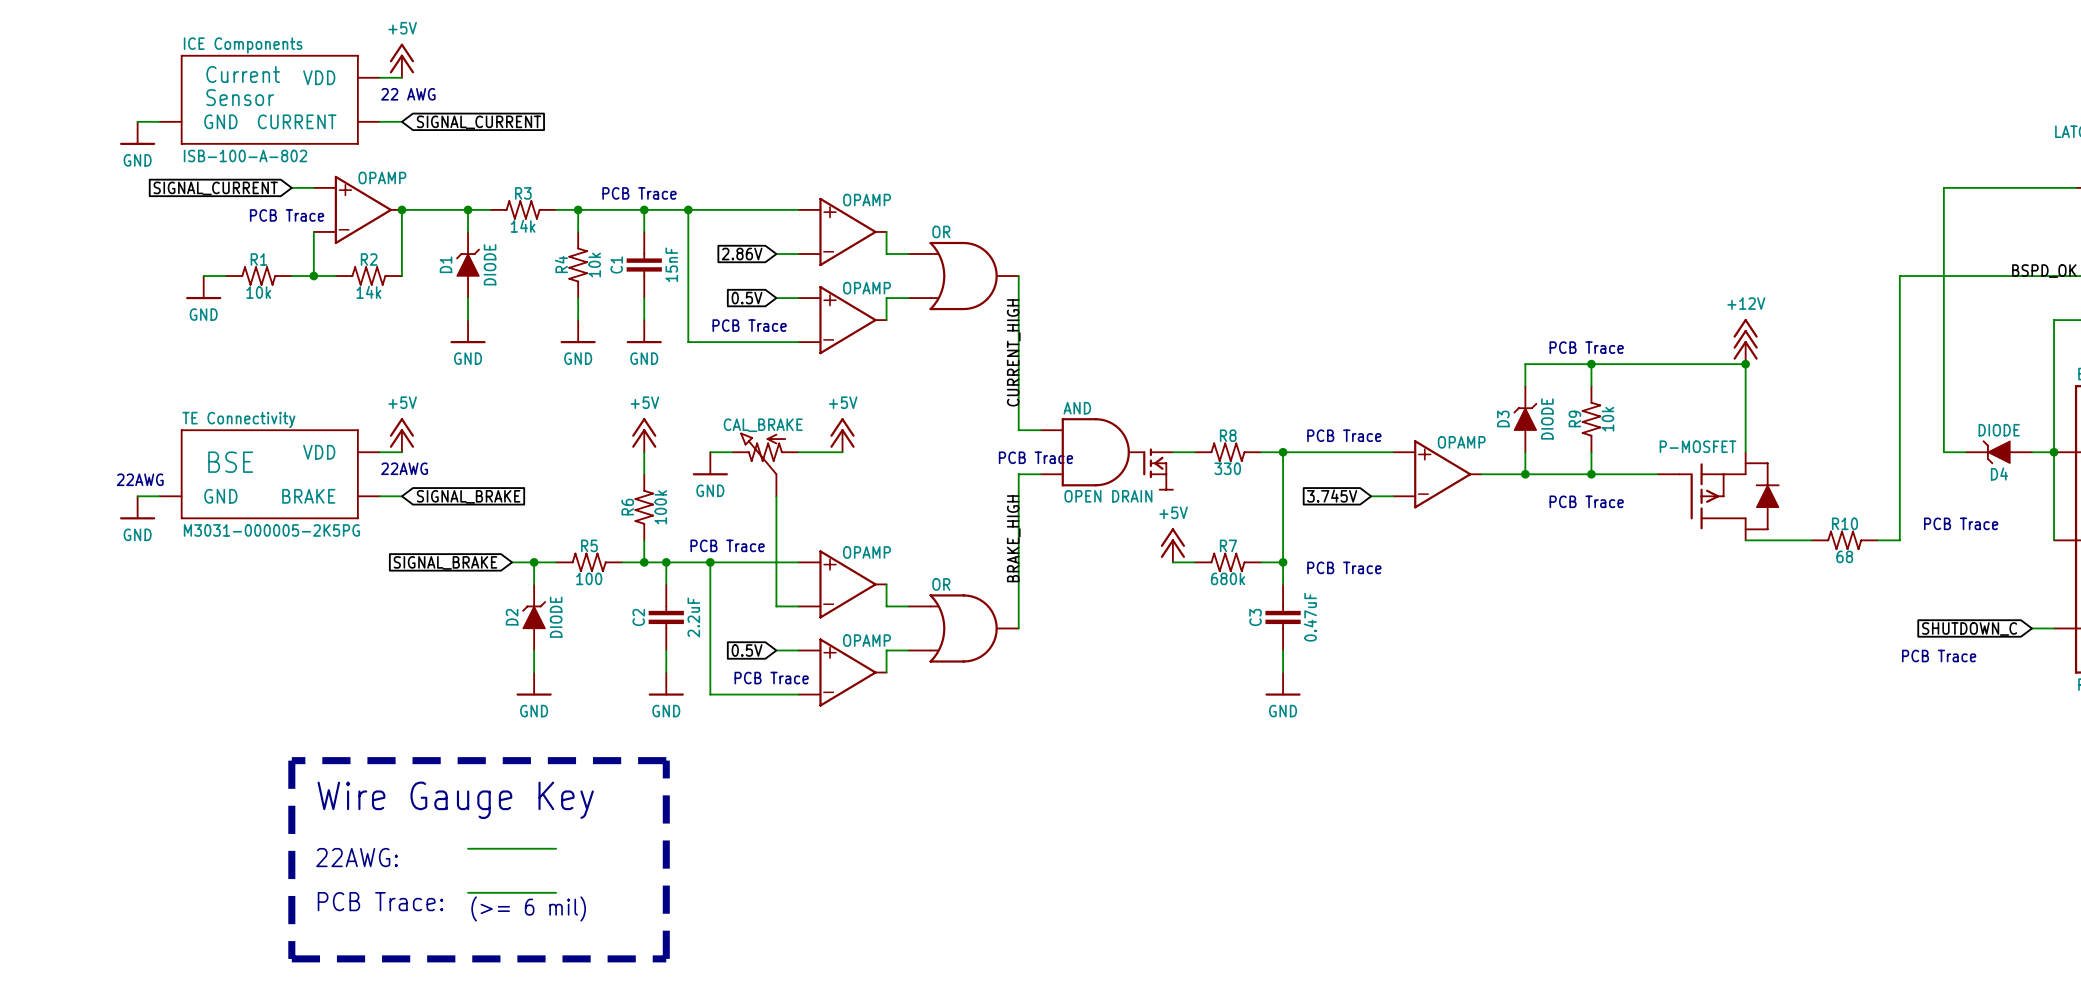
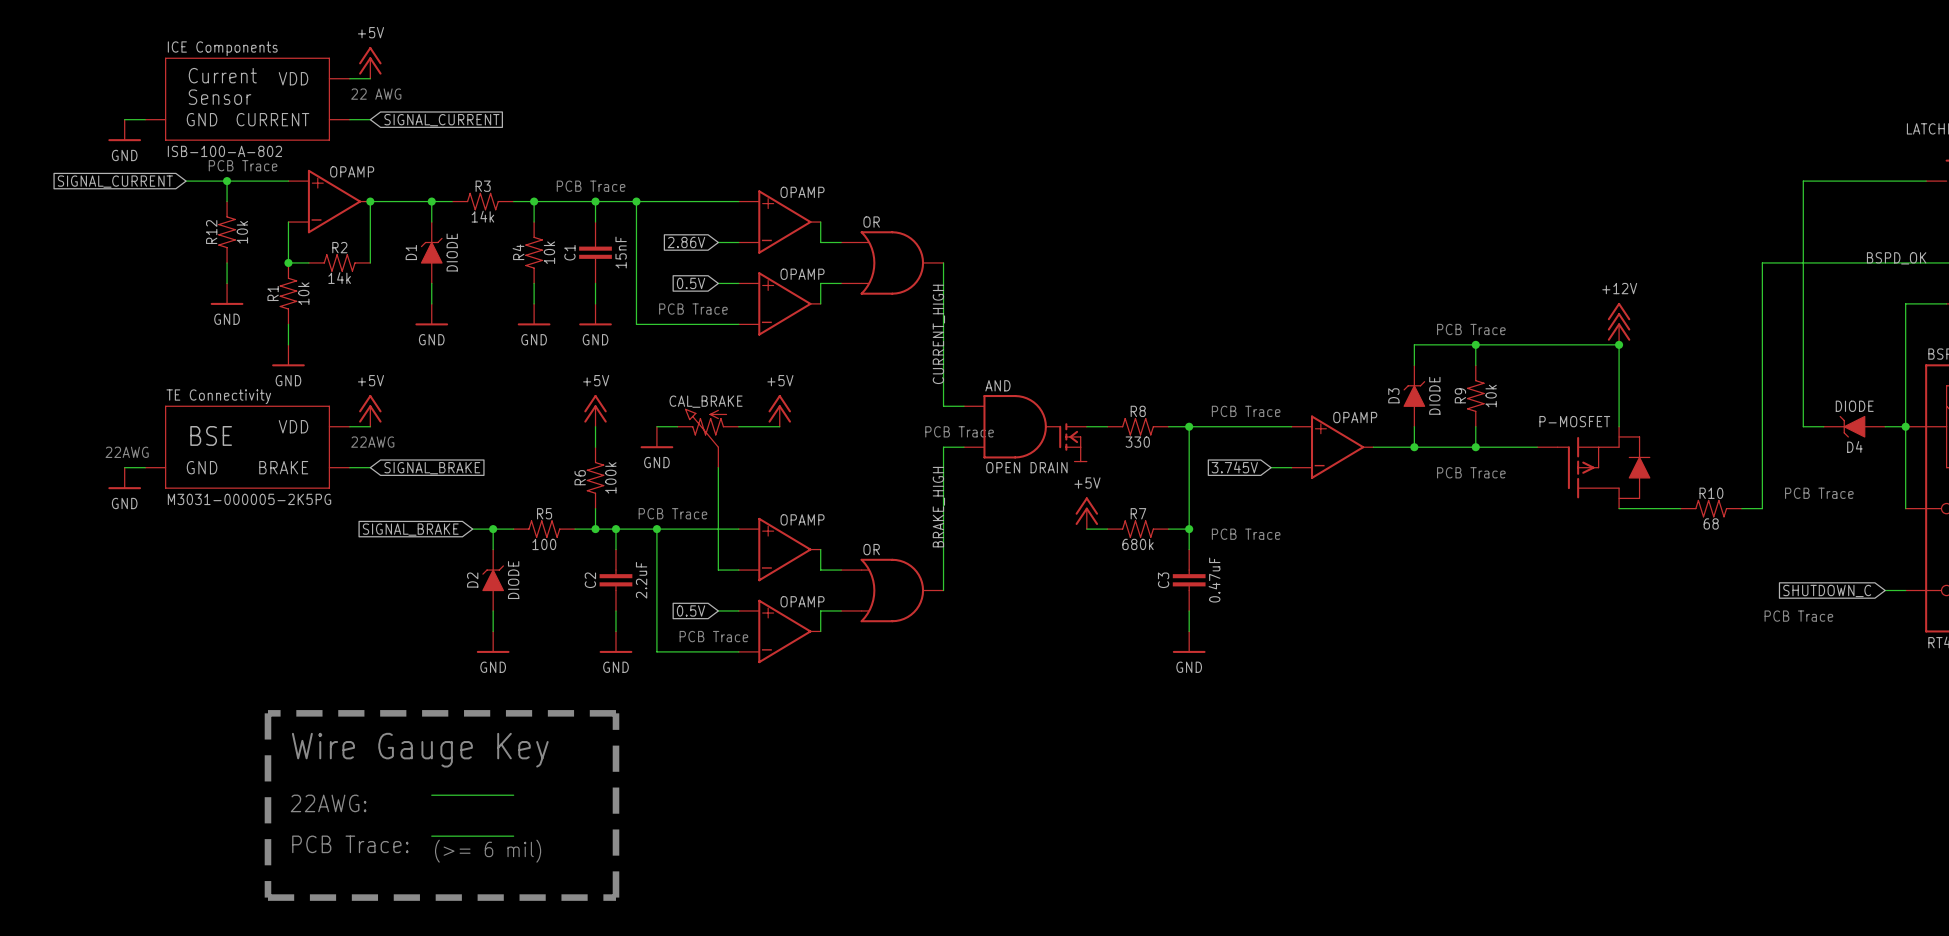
wire: none -> (186, 181) (267, 181)
wire: none -> (227, 181) (227, 201)
junction: none -> (227, 181)
global label position: SIGNAL_CURRENT (215, 188) -> SIGNAL_CURRENT (115, 181)
text position: PCB Trace (287, 215) -> PCB Trace (243, 165)
R12: none -> 10k (227, 232)
R1 name position: R1 (259, 259) -> R1 (273, 293)
wire: (203, 276) (225, 276) -> none
wire: none -> (227, 262) (227, 283)
R1 rotation: 0° (258, 276) -> 90° clockwise (288, 293)
R1 position: (258, 276) -> (288, 293)
wire: (291, 276) (313, 276) -> none
power symbol position: GND (203, 287) -> GND (227, 294)
R1 value position: 10k (258, 292) -> 10k (303, 293)
wire: none -> (288, 324) (288, 344)
power symbol: none -> GND (288, 355)

